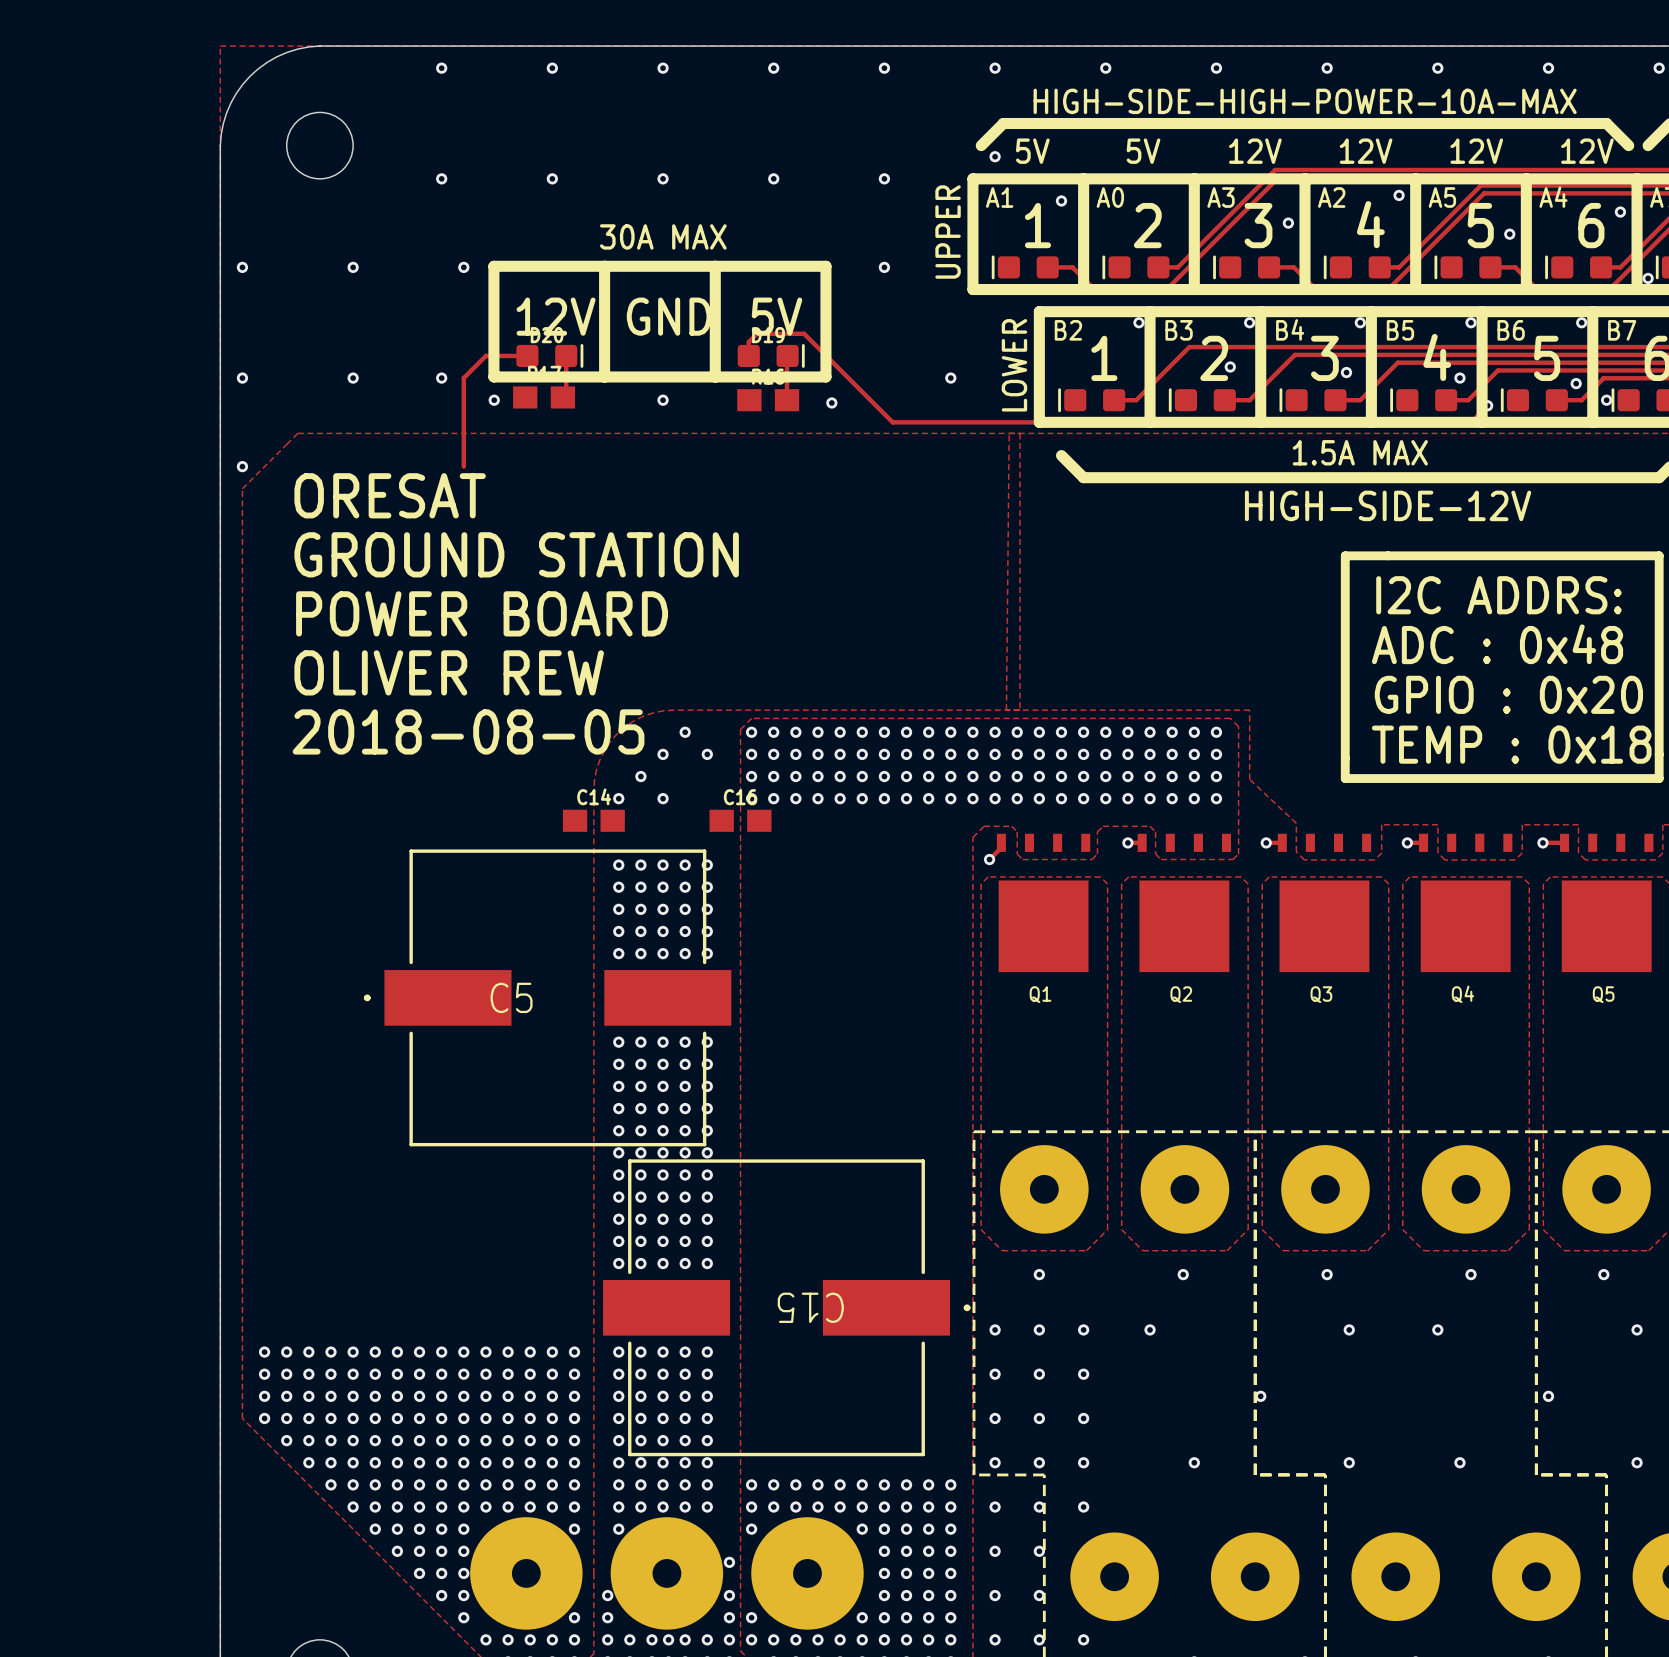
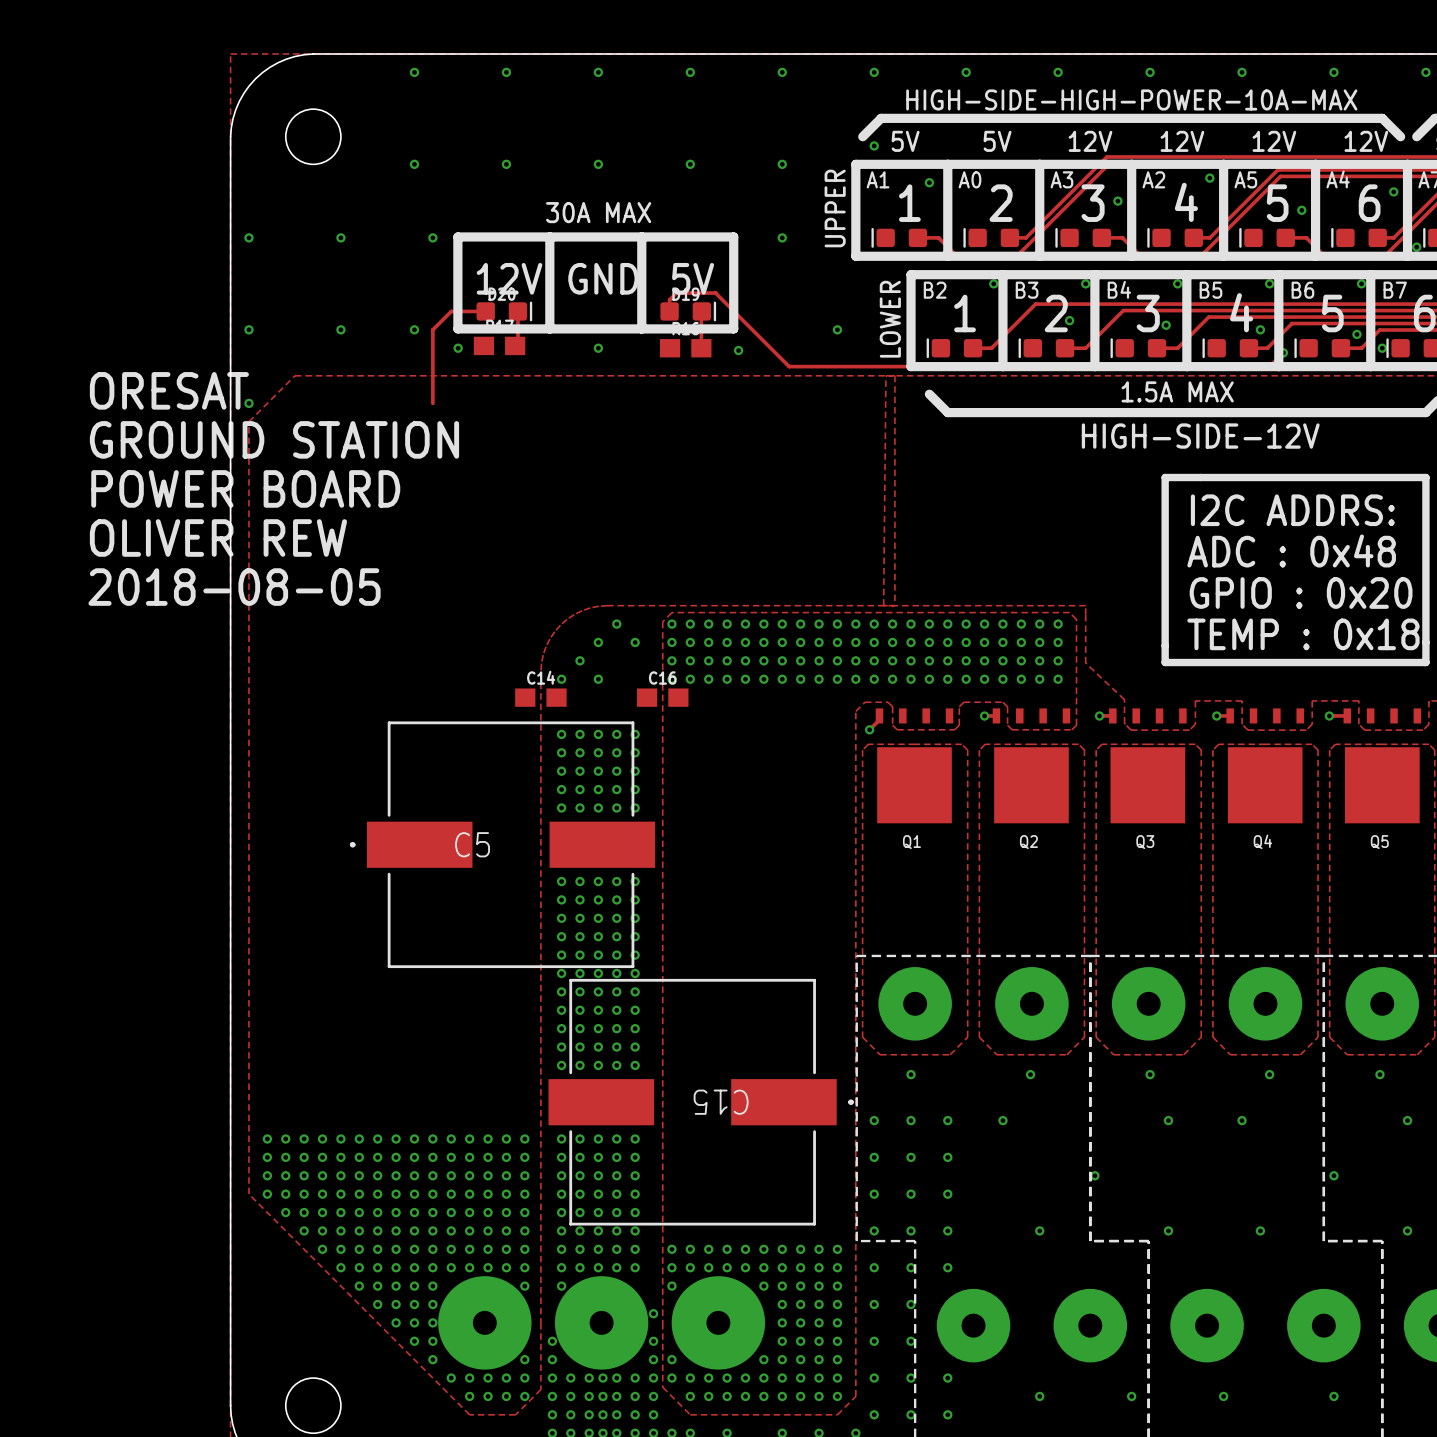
text position: ORESAT (390, 495) -> ORESAT (169, 390)
text position: GROUND STATION (516, 554) -> GROUND STATION (274, 439)
text position: POWER BOARD (482, 613) -> POWER BOARD (245, 488)
text position: OLIVER REW (449, 672) -> OLIVER REW (218, 537)
text position: 2018-08-05 (468, 731) -> 2018-08-05 (234, 587)

